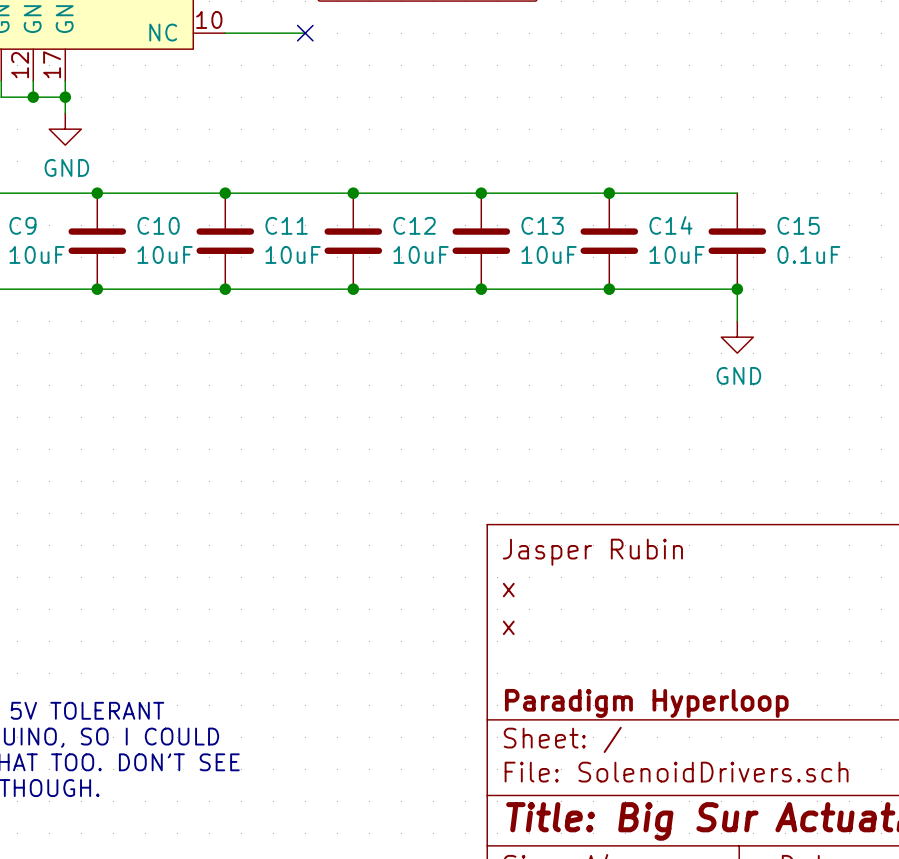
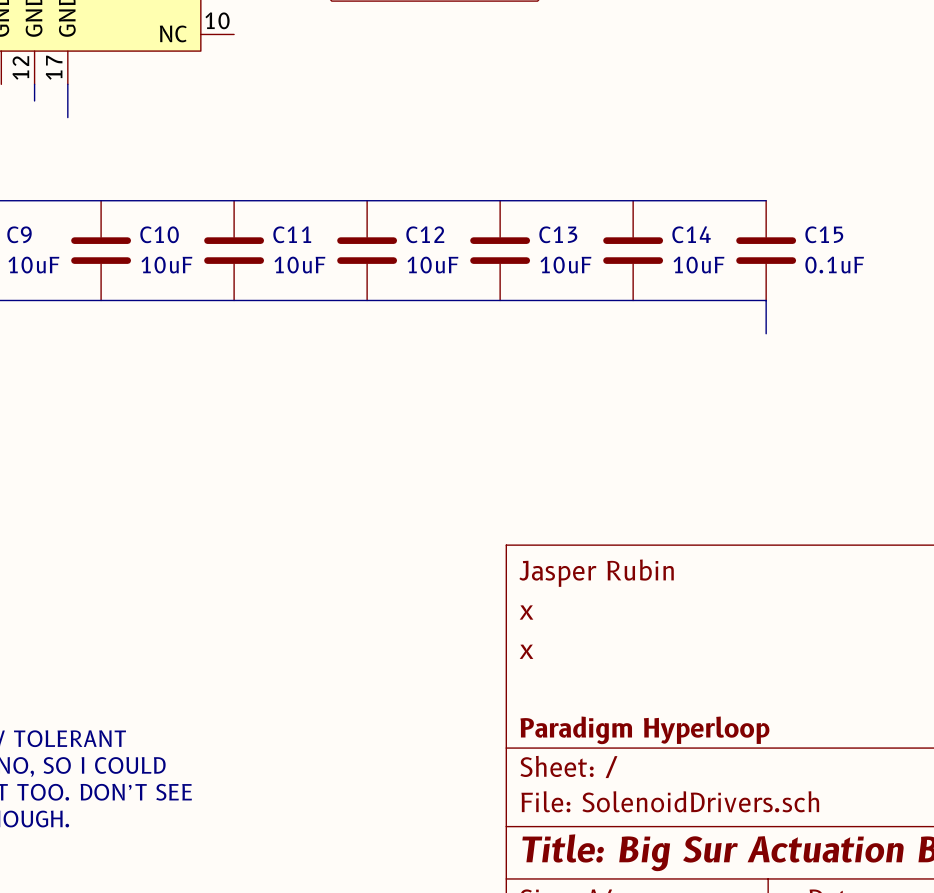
wire: (225, 33) (305, 33) -> none
no-connect mark: (305, 33) -> none
wire: (1, 81) (1, 97) (65, 97) -> none
junction: (33, 97) -> none
junction: (65, 97) -> none
power symbol: GND (65, 129) -> none
junction: (97, 193) -> none
junction: (225, 193) -> none
junction: (353, 193) -> none
junction: (481, 193) -> none
junction: (609, 193) -> none
junction: (97, 289) -> none
junction: (225, 289) -> none
junction: (353, 289) -> none
junction: (481, 289) -> none
junction: (609, 289) -> none
junction: (737, 289) -> none
power symbol: GND (737, 337) -> none

